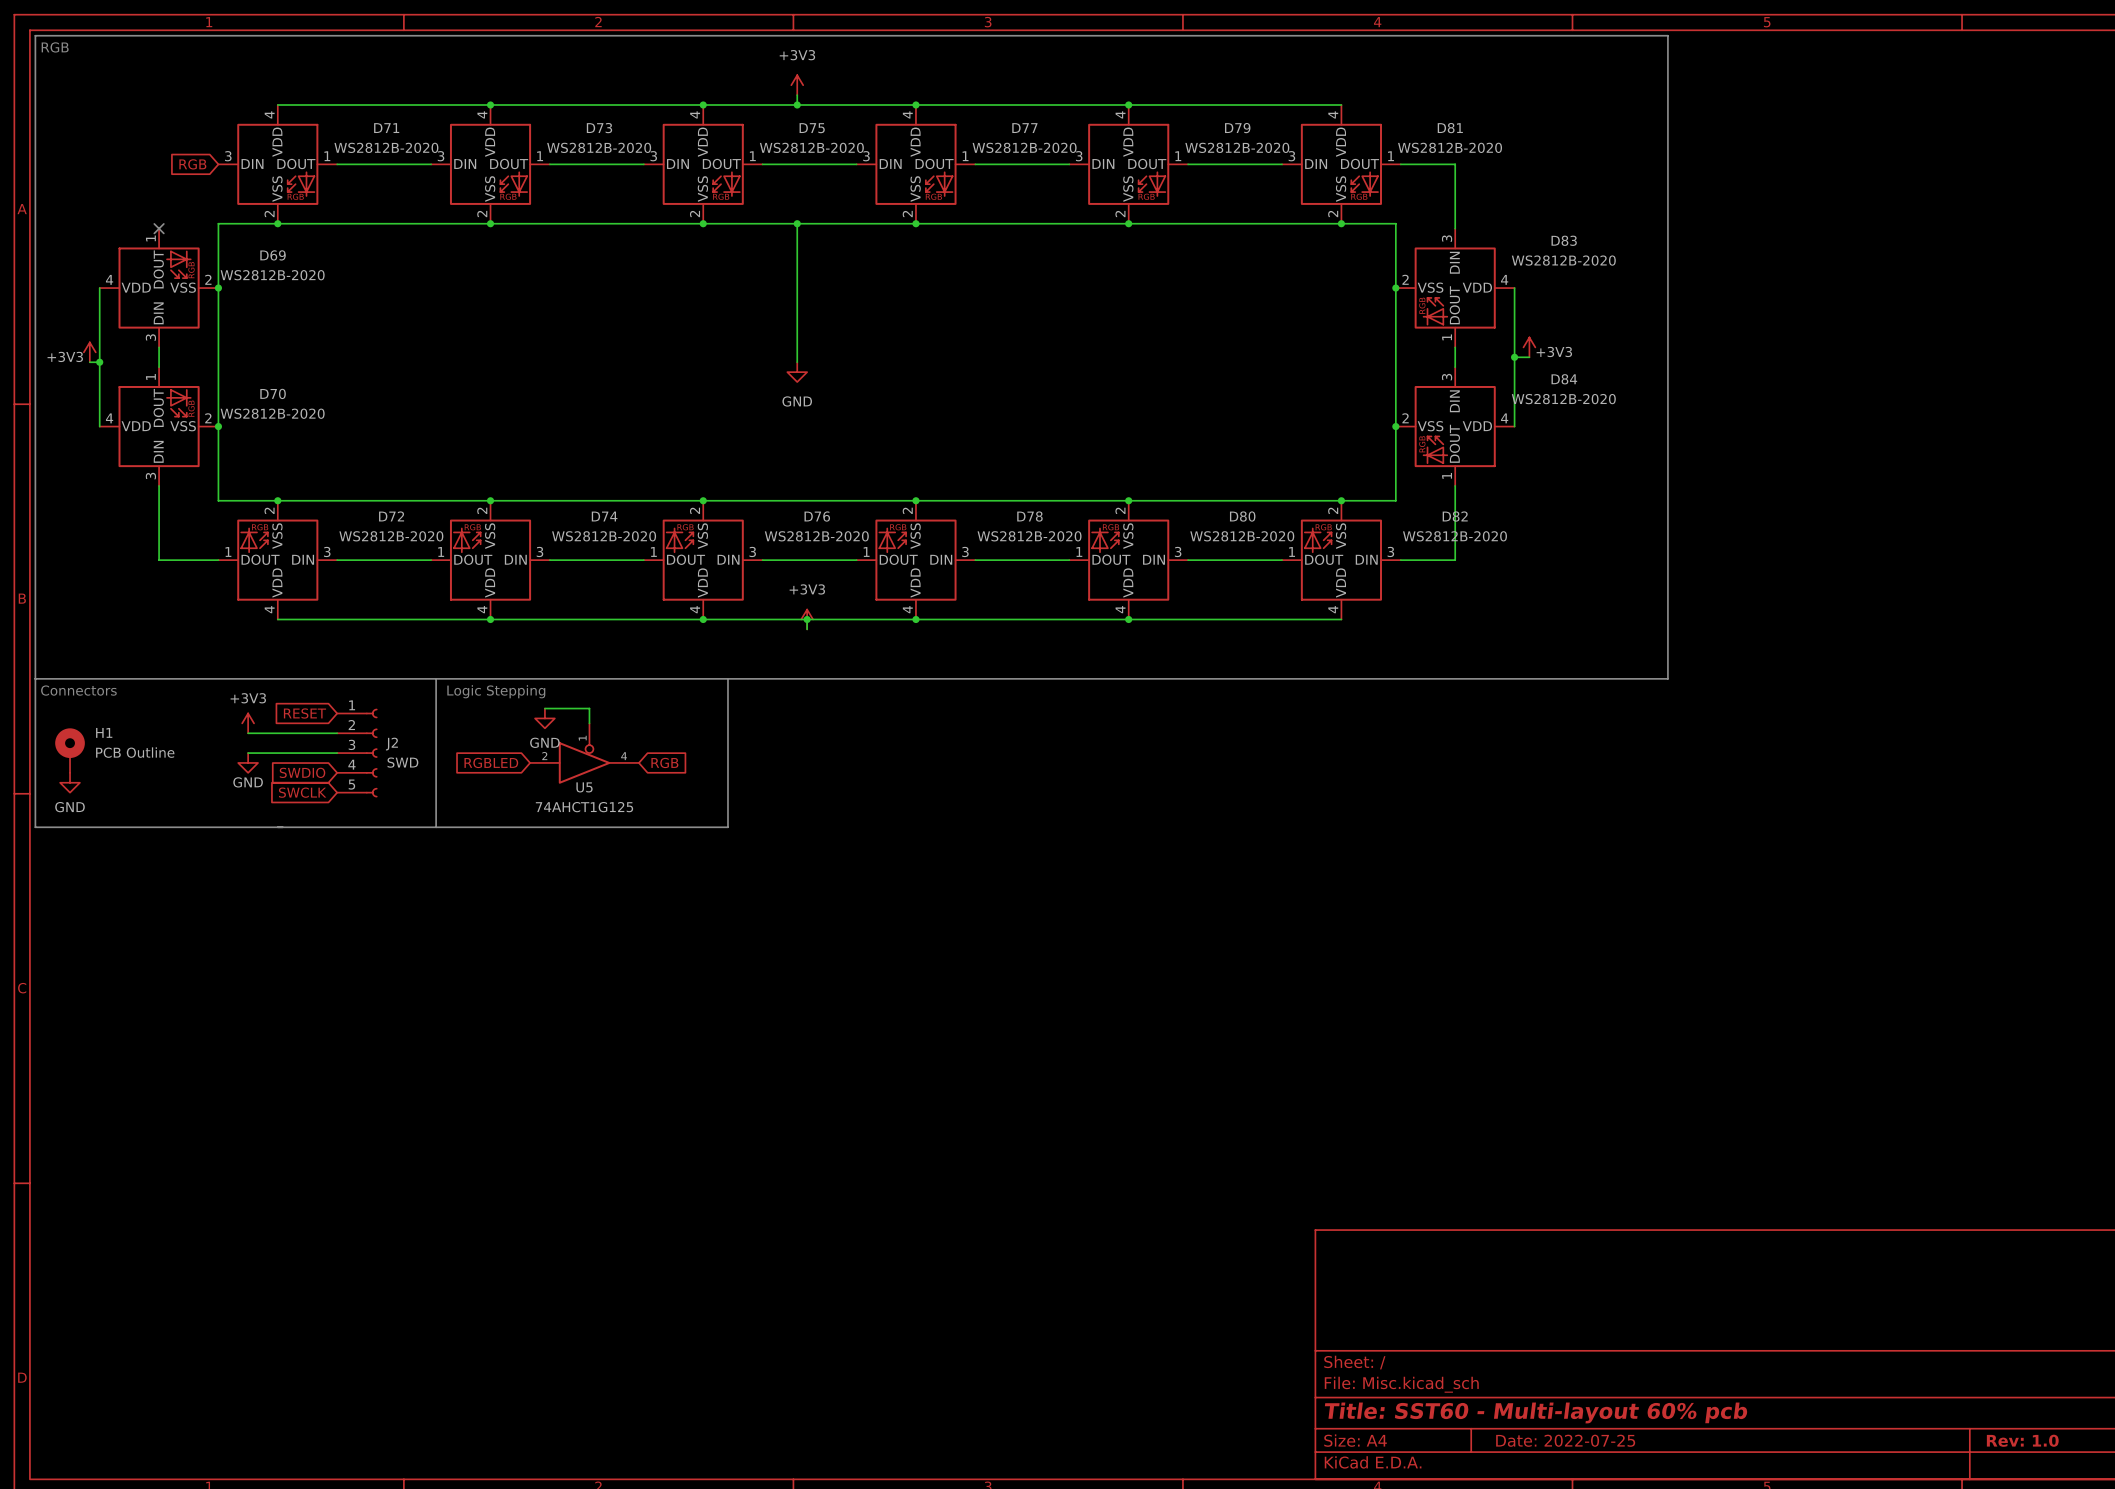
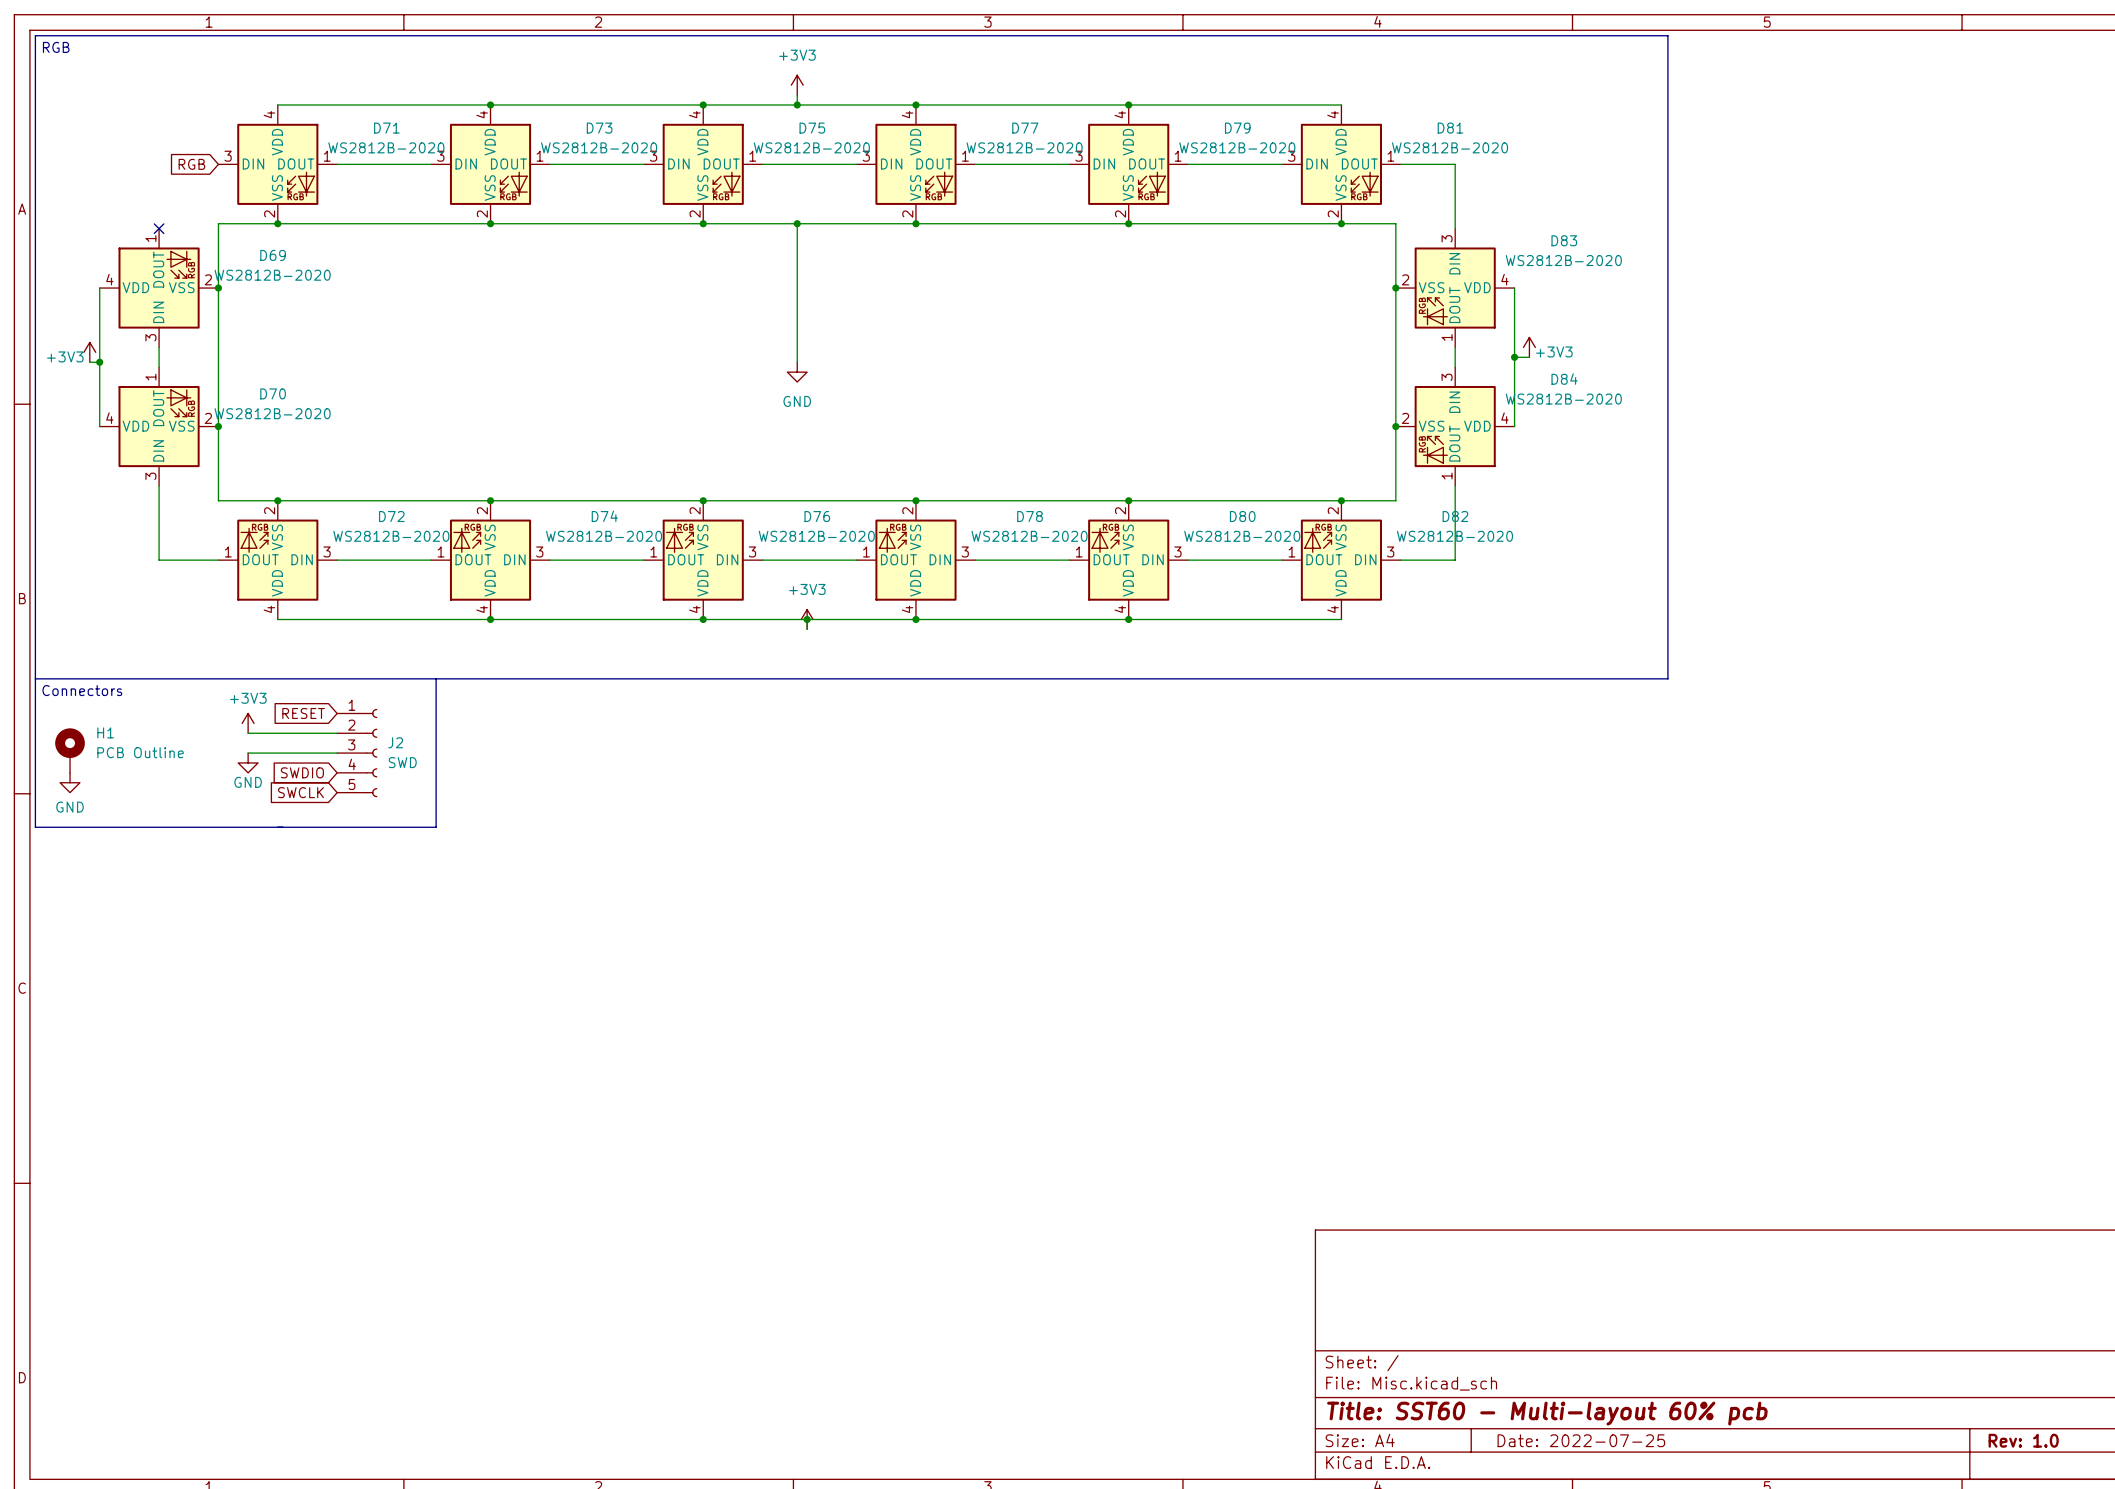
line: (727, 678) (727, 827) (436, 827) -> none
text: Logic Stepping (496, 691) -> none
wire: (544, 708) (589, 708) (589, 723) -> none
power symbol: GND (544, 718) -> none
U5: 74AHCT1G125 (584, 753) -> none
global label: RGBLED (491, 762) -> none
global label: RGB (664, 762) -> none

